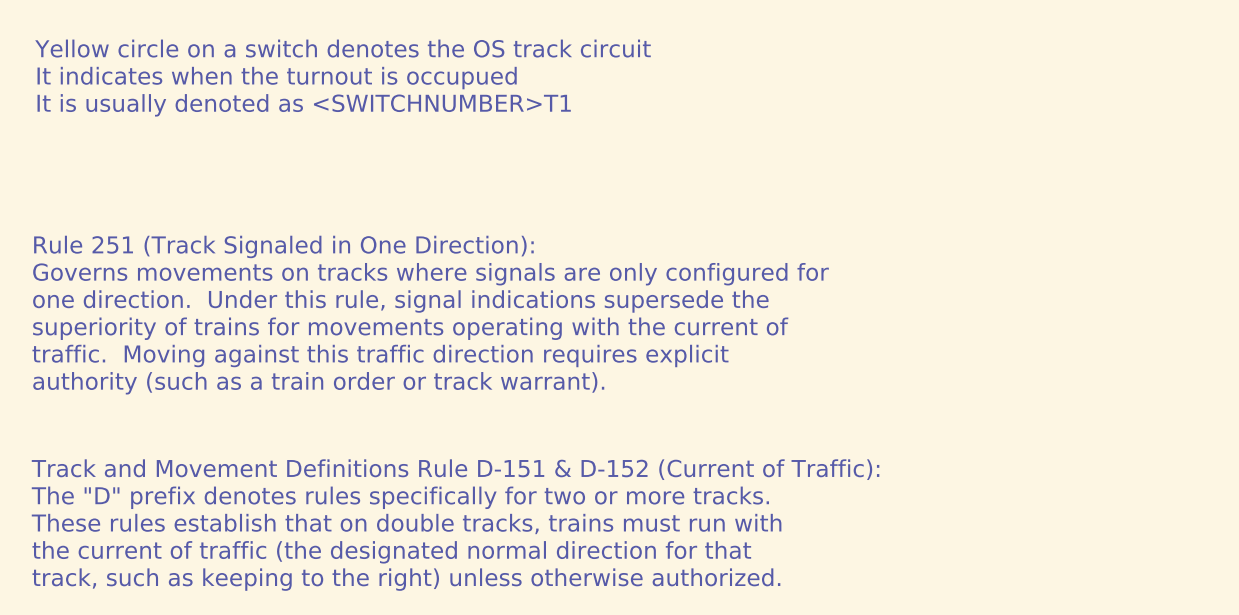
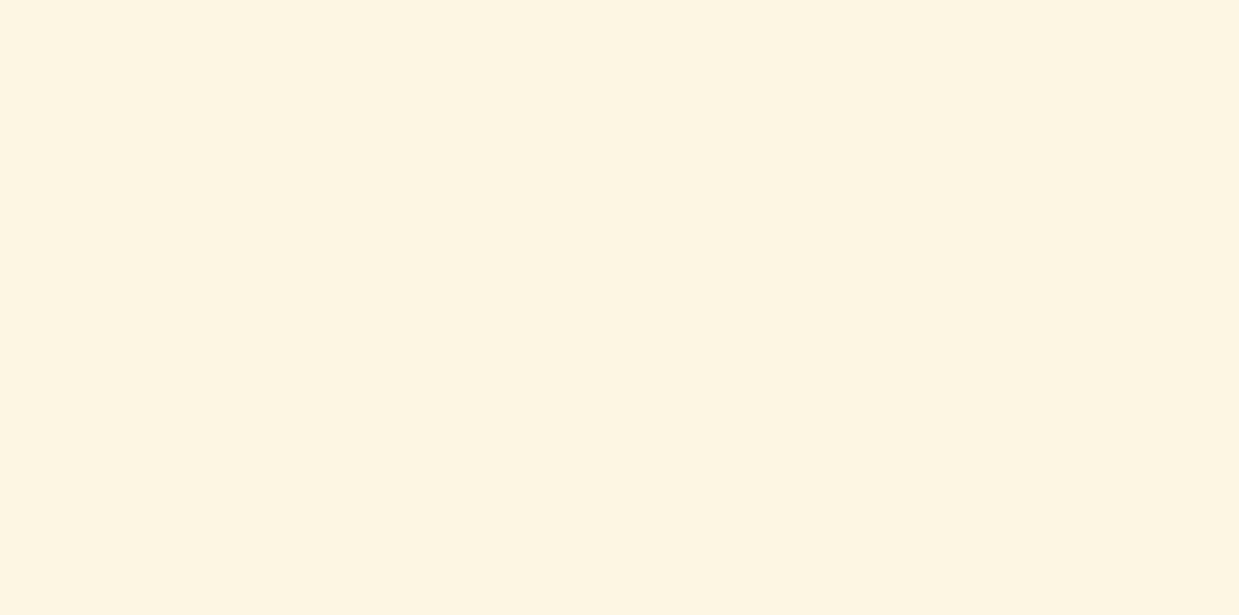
text: Yellow circle on a switch denotes the OS track circuit (342, 48) -> none
text: It indicates when the turnout is occupued (277, 78) -> none
text: It is usually denoted as <SWITCHNUMBER>T1 (304, 105) -> none
text: Rule 251 (Track Signaled in One Direction): (283, 246) -> none
text: Governs movements on tracks where signals are only configured for (431, 274) -> none
text: one direction. Under this rule, signal indications supersede the (400, 301) -> none
text: superiority of trains for movements operating with the current of (410, 328) -> none
text: traffic. Moving against this traffic direction requires explicit (380, 355) -> none
text: authority (such as a train order or track warrant). (318, 383) -> none
text: Track and Movement Definitions Rule D-151 & D-152 (Current of Traffic): (455, 469) -> none
text: The "D" prefix denotes rules specifically for two or more tracks. (400, 497) -> none
text: These rules establish that on double tracks, trains must run with (406, 524) -> none
text: the current of traffic (the designated normal direction for that (391, 552) -> none
text: track, such as keeping to the right) unless otherwise authorized. (406, 579) -> none

